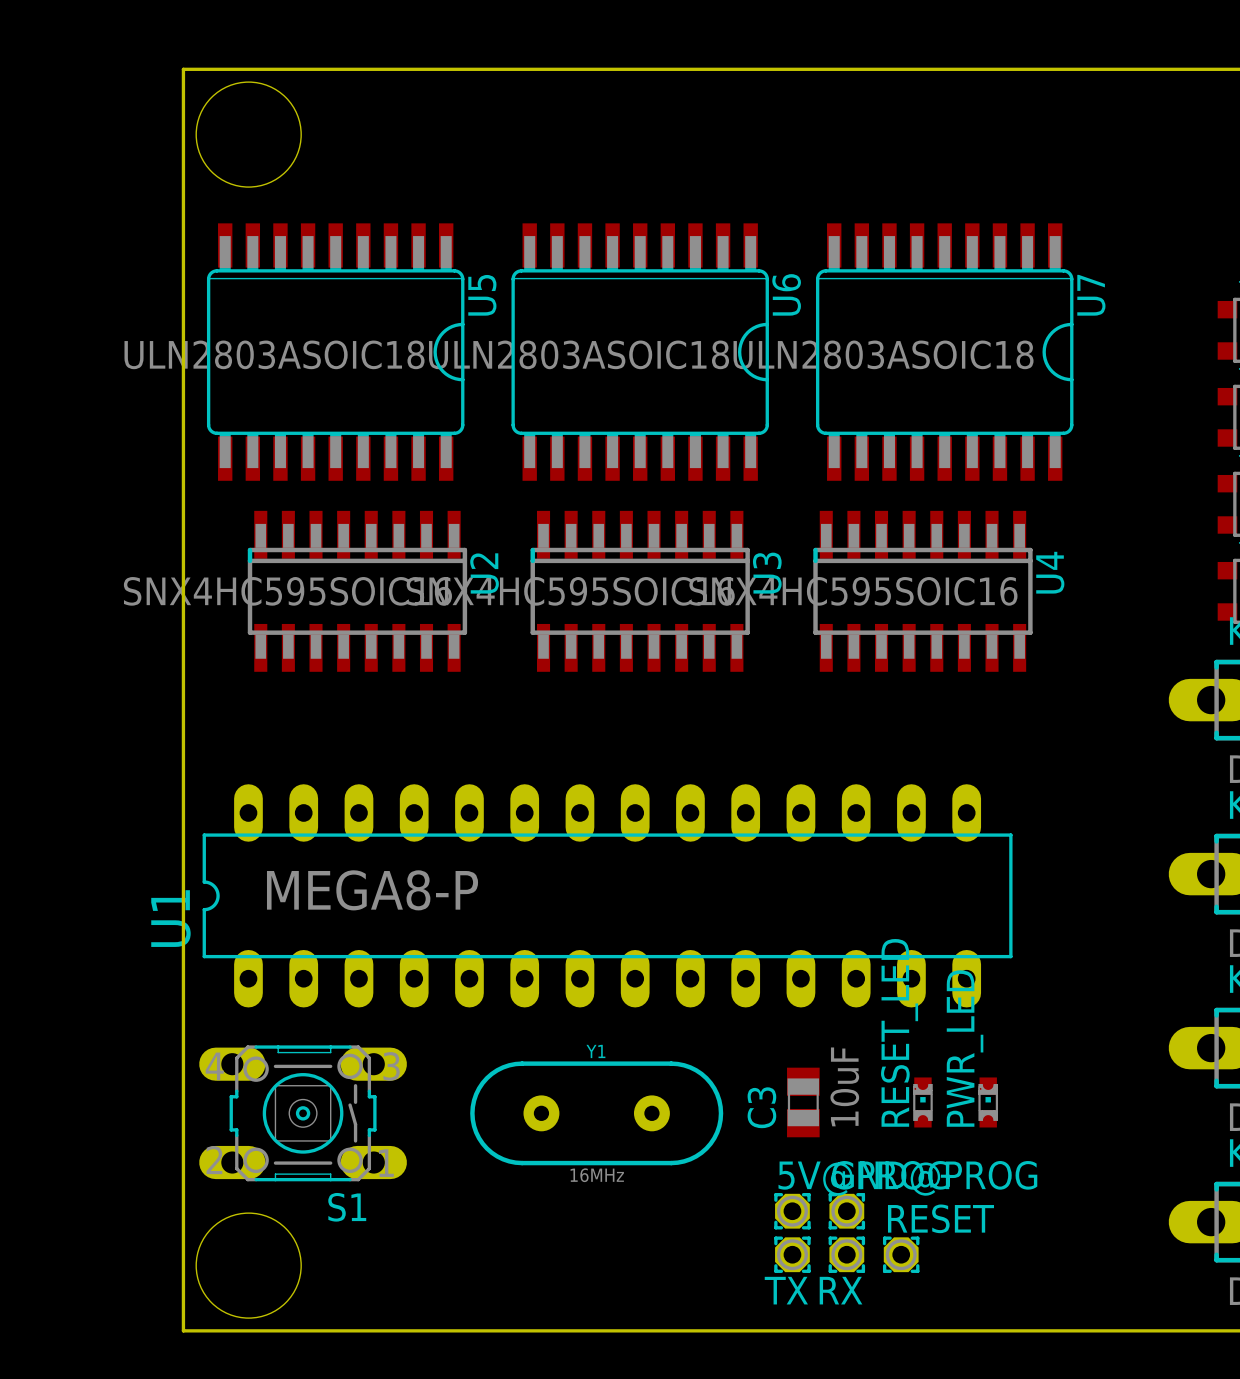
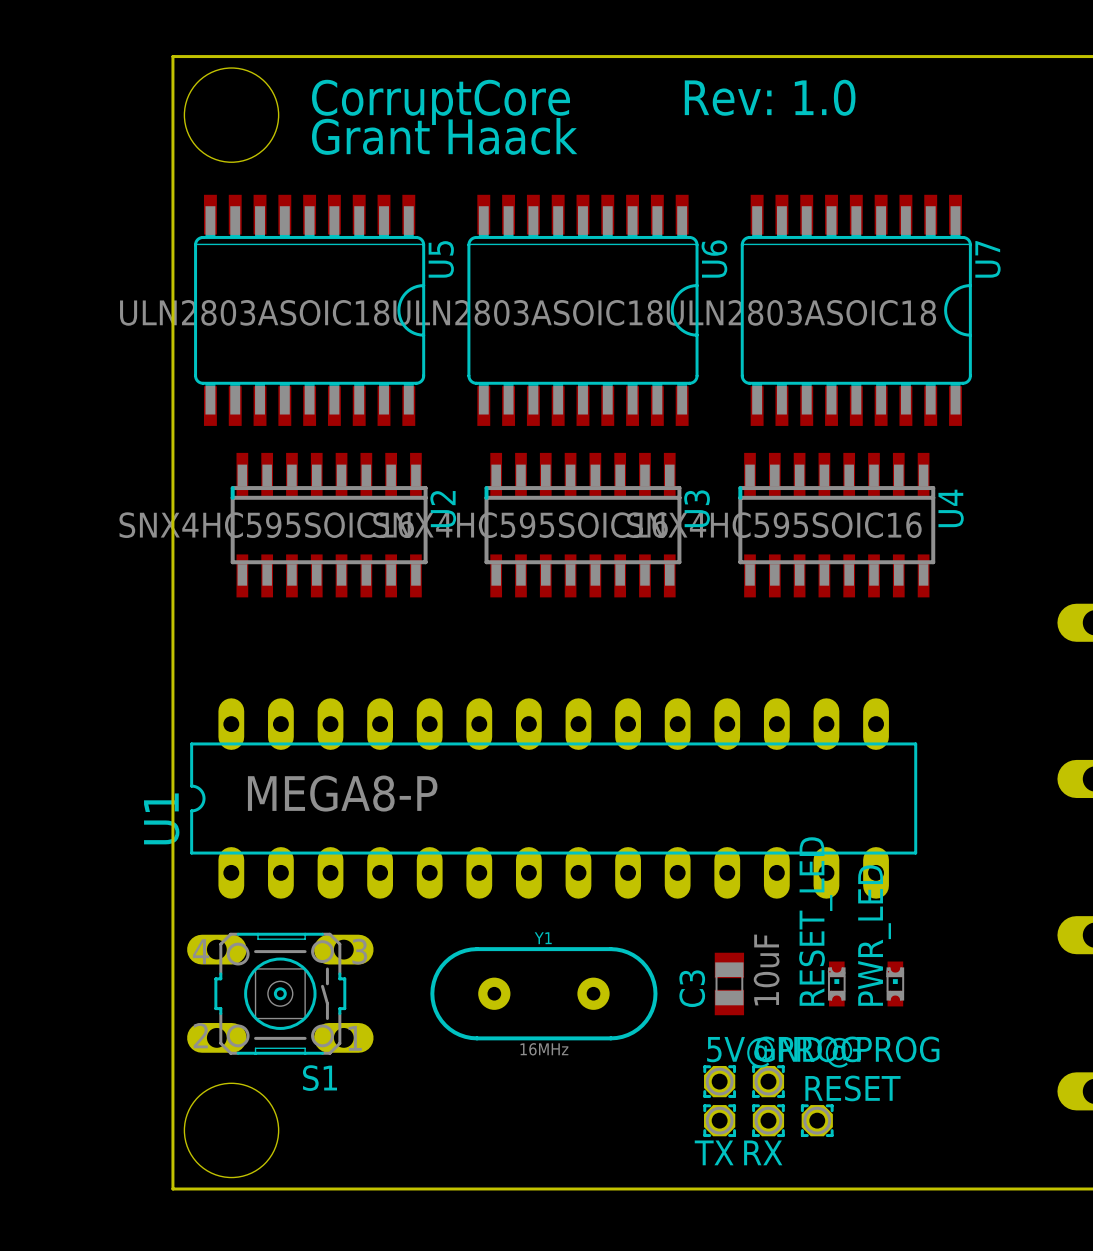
text: none -> Rev: 1.0 (770, 97)
text: none -> CorruptCore (441, 102)
text: none -> Grant Haack (444, 136)

